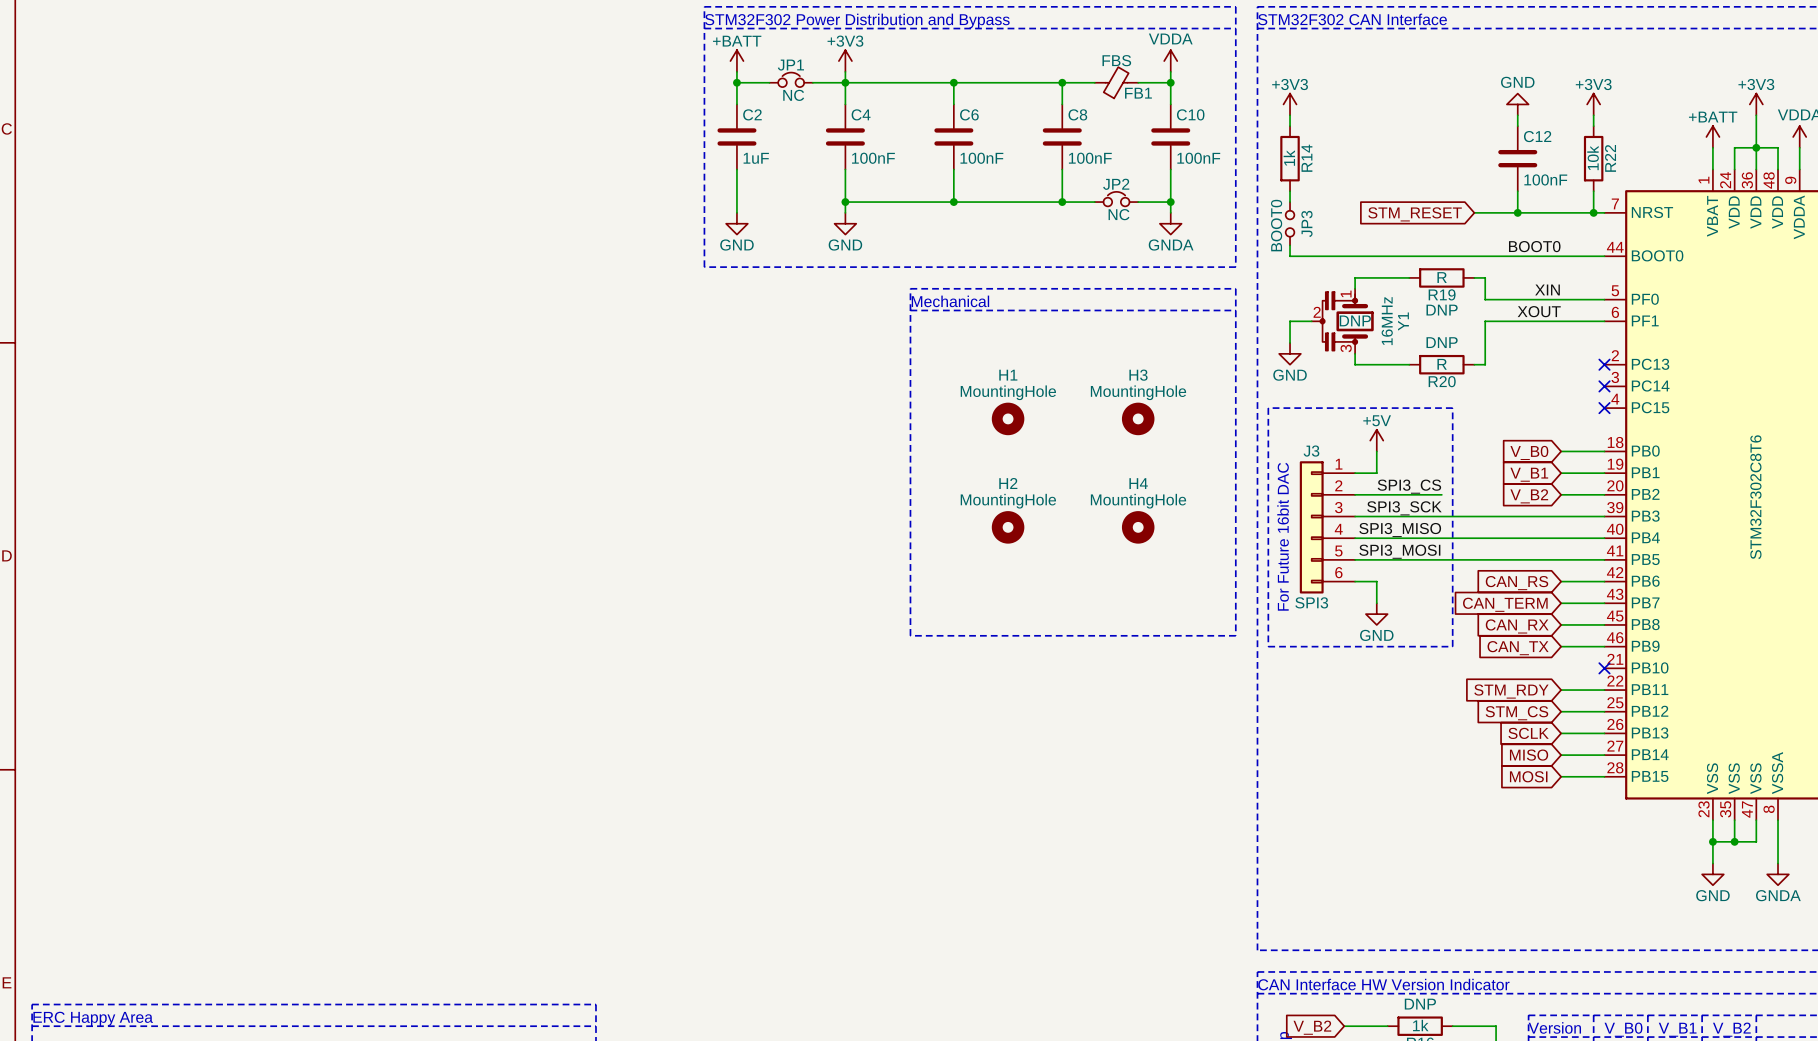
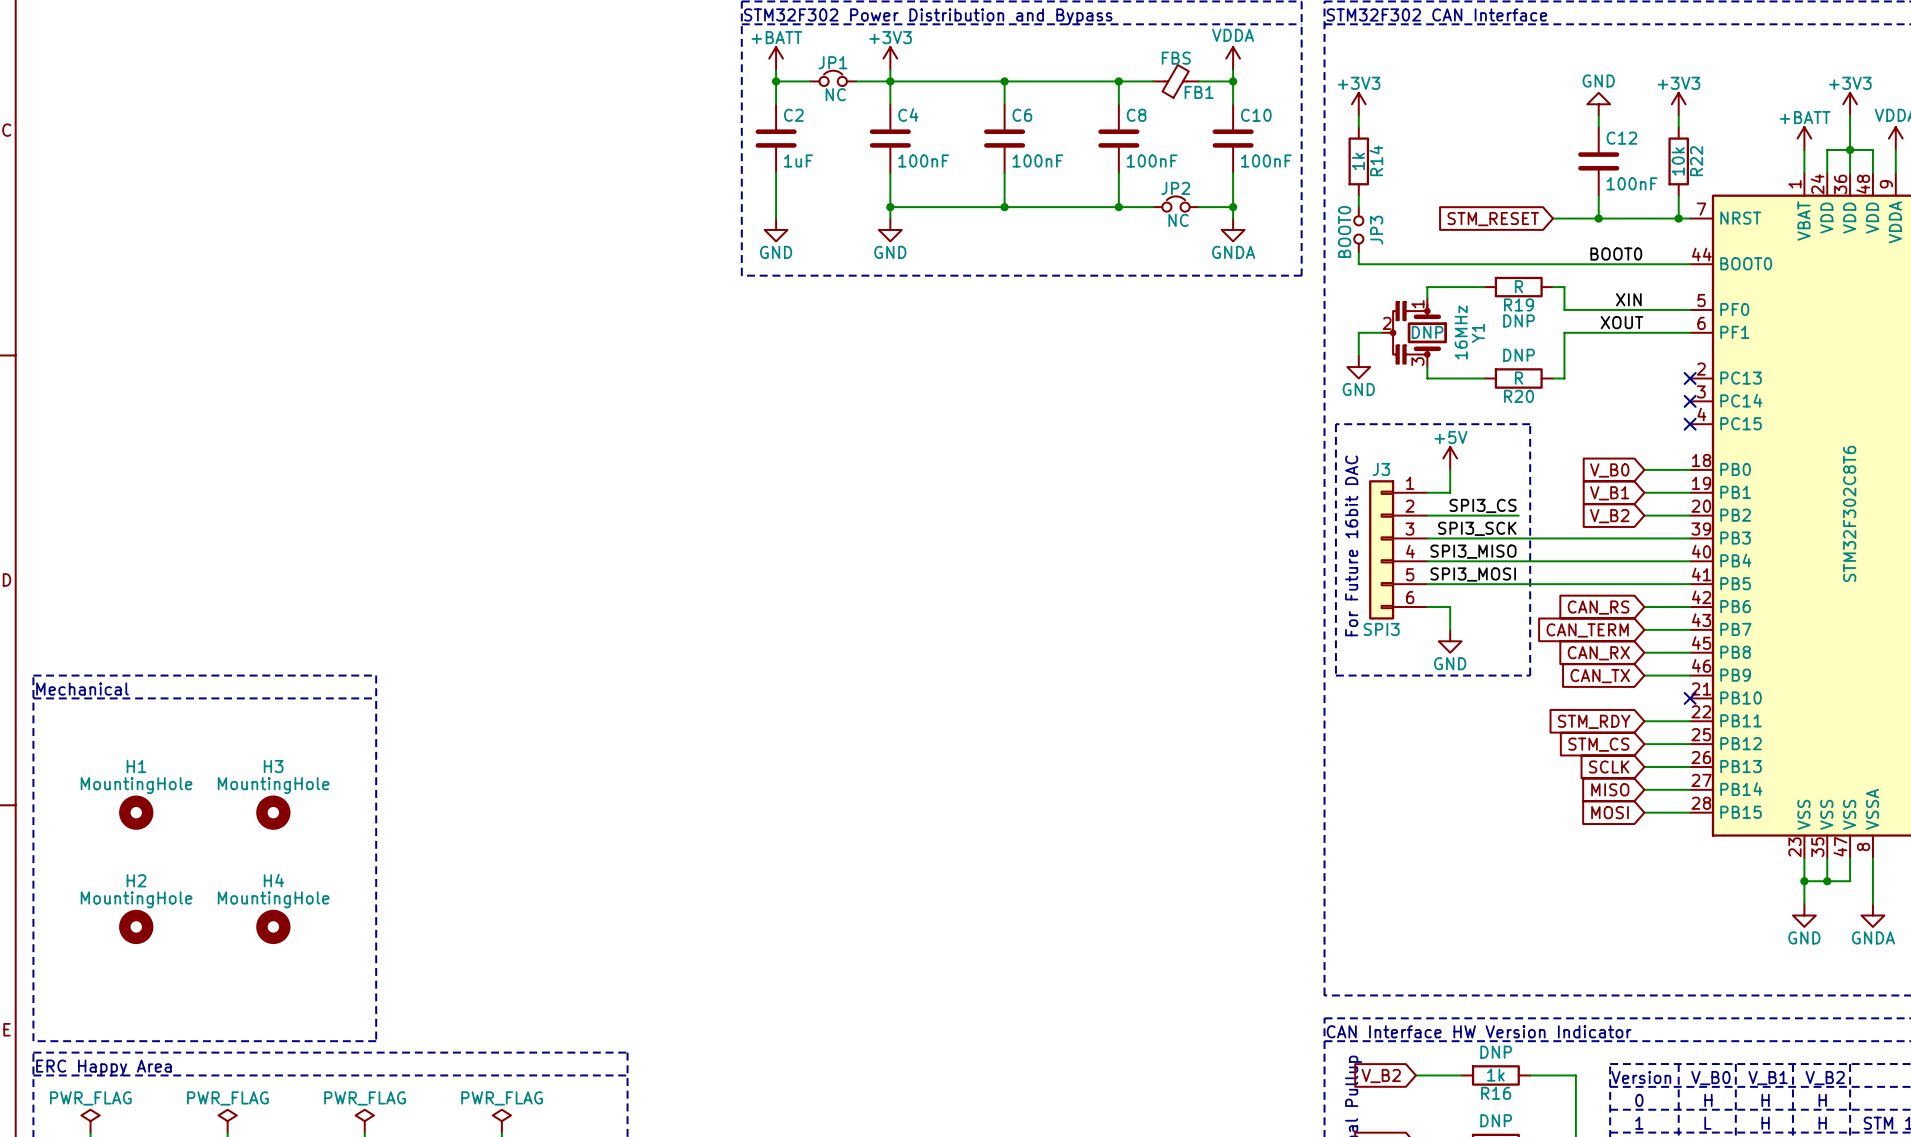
line: (910, 288) (910, 635) (1235, 635) (1235, 288) (910, 288) -> none
text: Mechanical (950, 301) -> none
line: (910, 310) (1235, 310) -> none
H1 position: (1008, 418) -> (136, 812)
H3 position: (1138, 418) -> (273, 812)
H2 position: (1008, 527) -> (136, 926)
H4 position: (1138, 527) -> (273, 926)
line: none -> (33, 675) (33, 1041) (376, 1041) (376, 675) (33, 675)
text: none -> Mechanical (82, 689)
line: none -> (33, 698) (376, 698)

